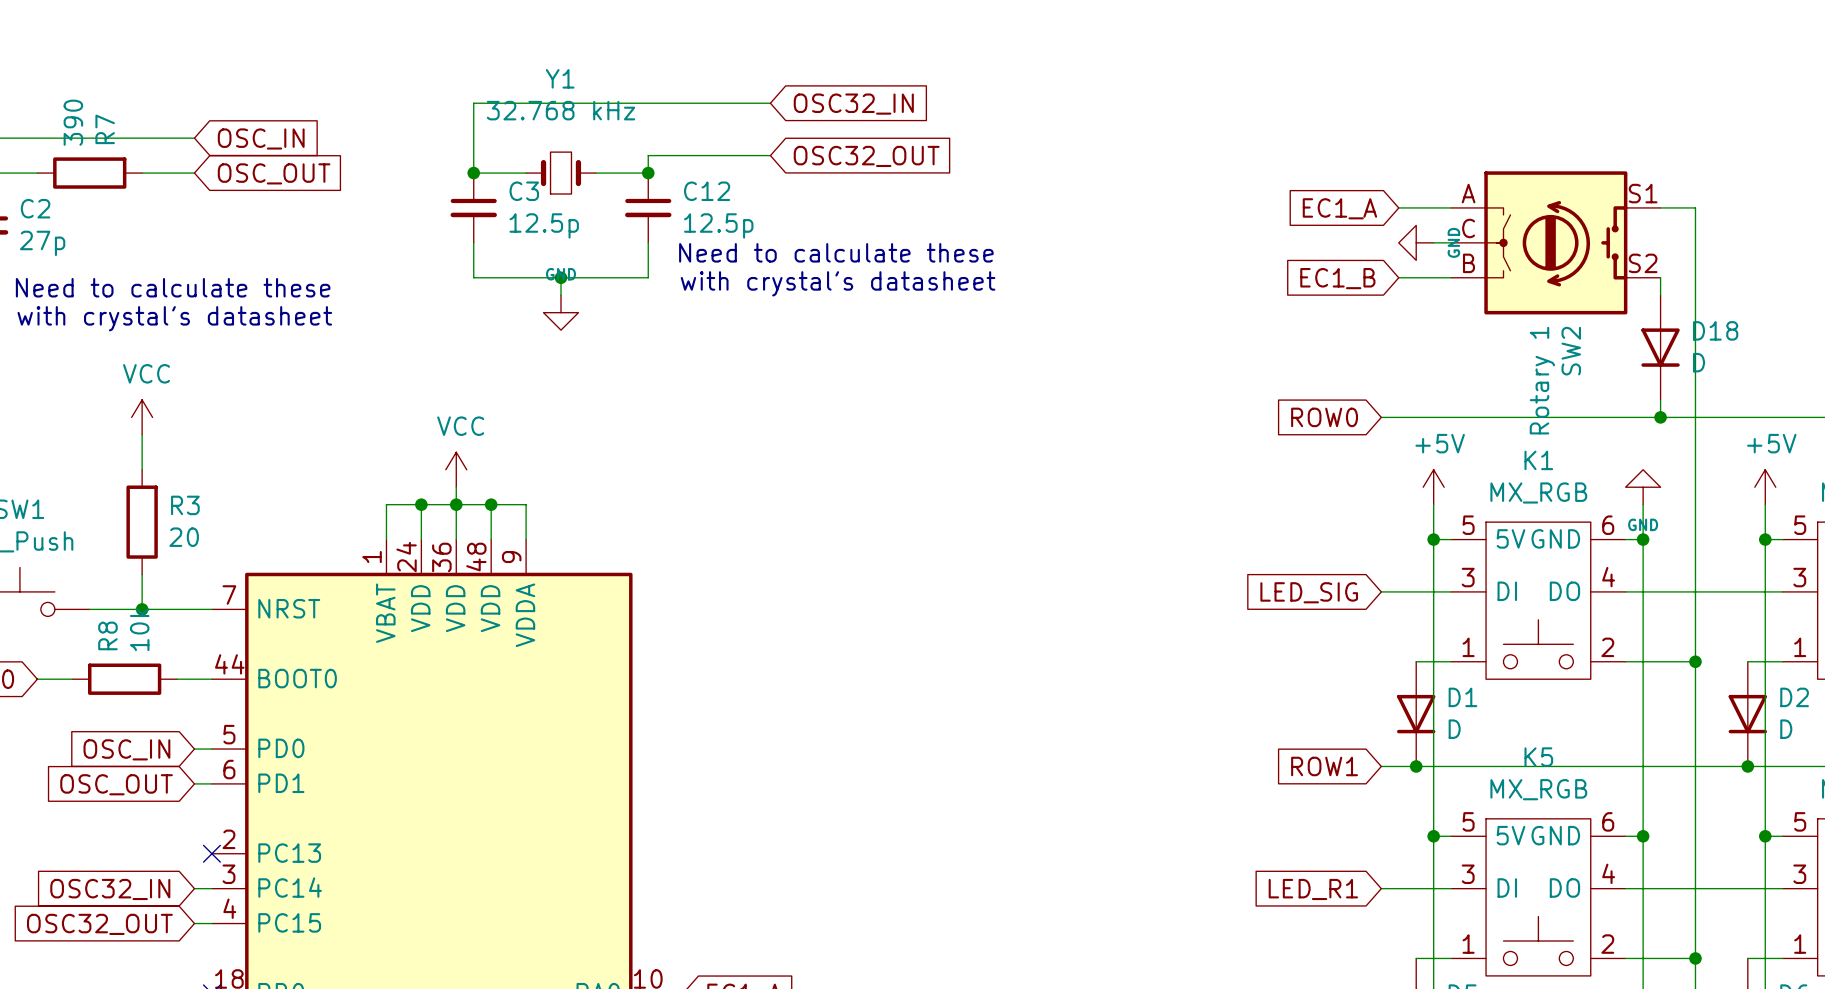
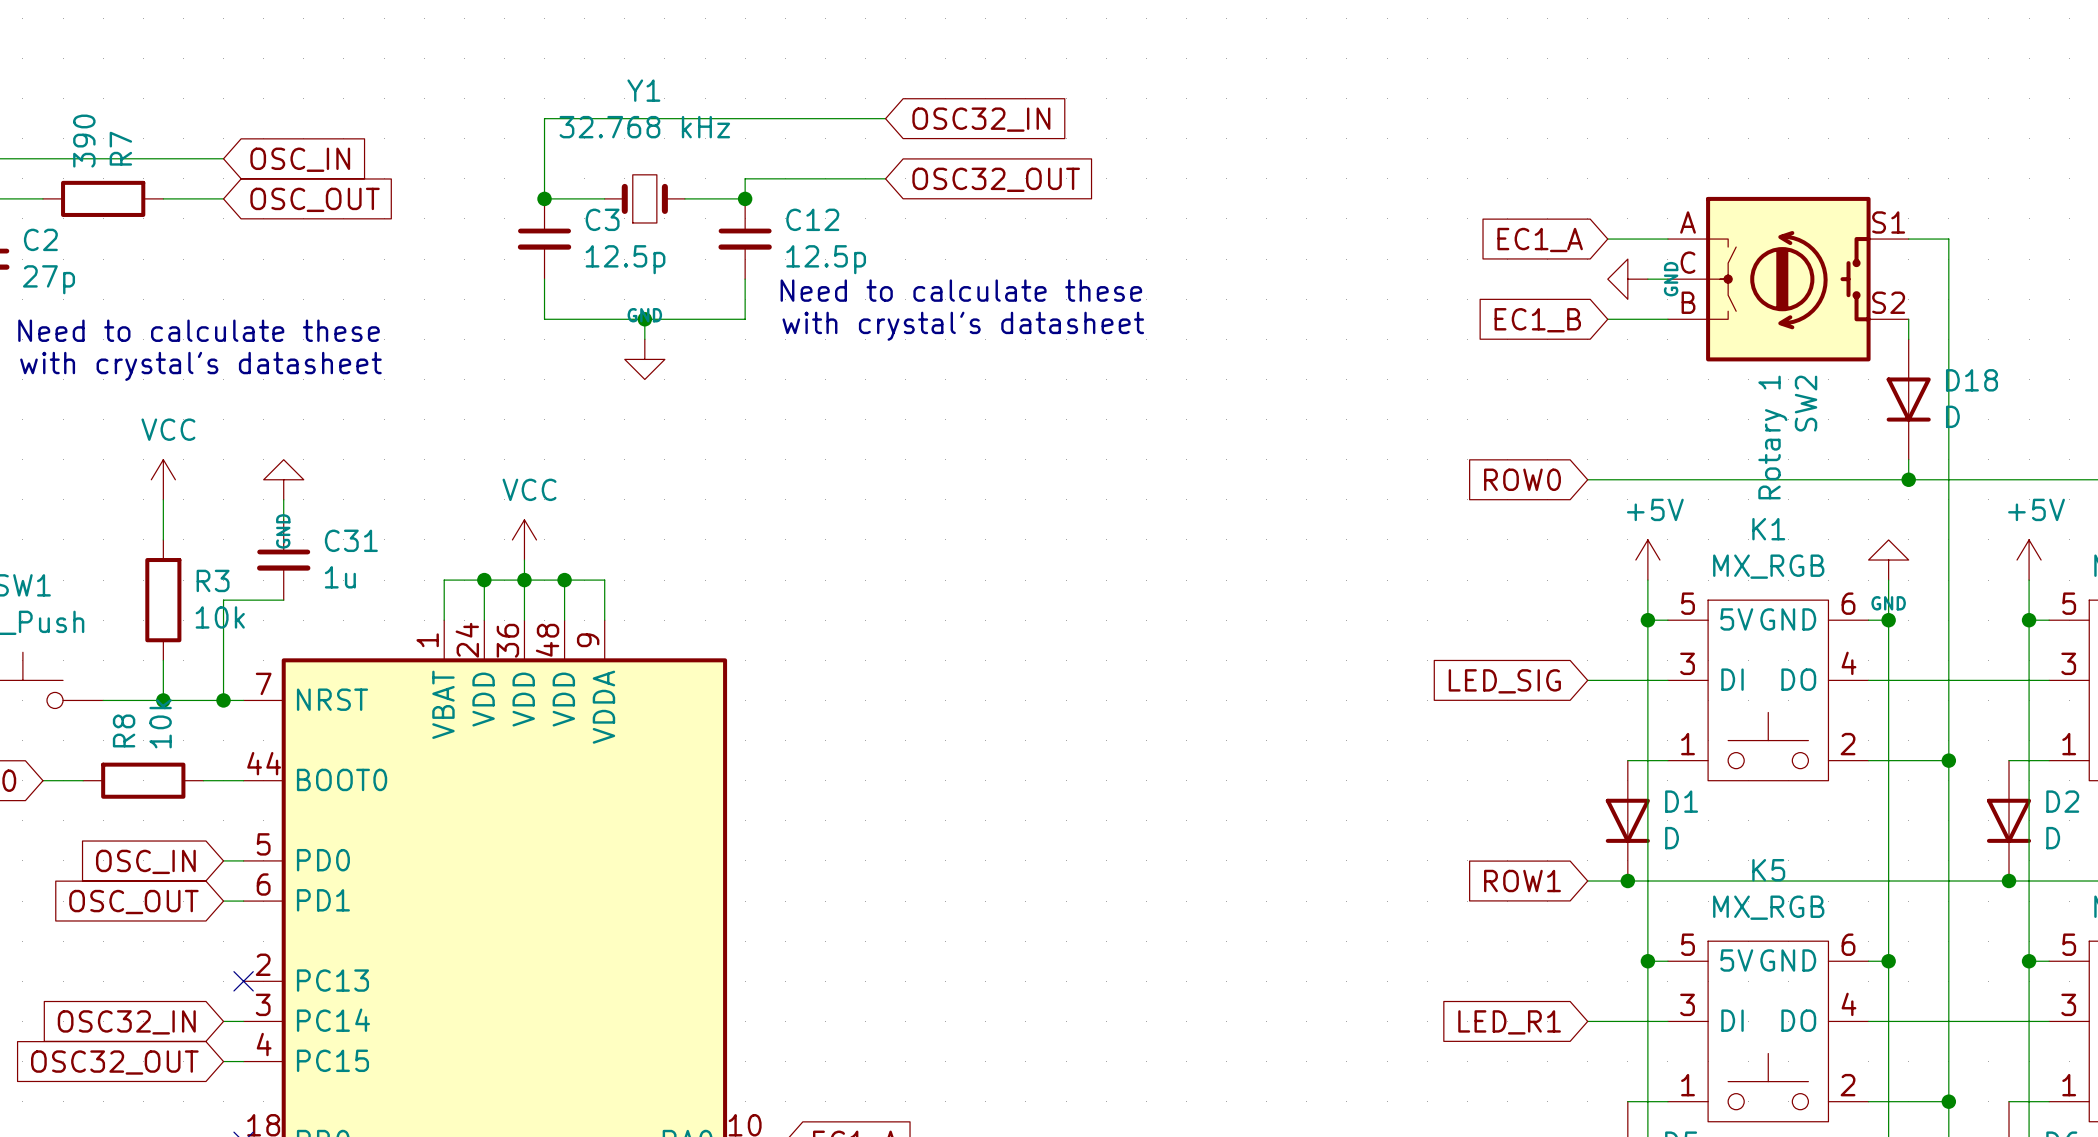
power symbol: none -> GND (283, 479)
wire: none -> (283, 499) (283, 519)
C31: none -> 1u (283, 560)
wire: none -> (283, 600) (223, 600) (223, 700)
R3 value: 20 (184, 537) -> 10k (220, 617)
junction: none -> (223, 700)

